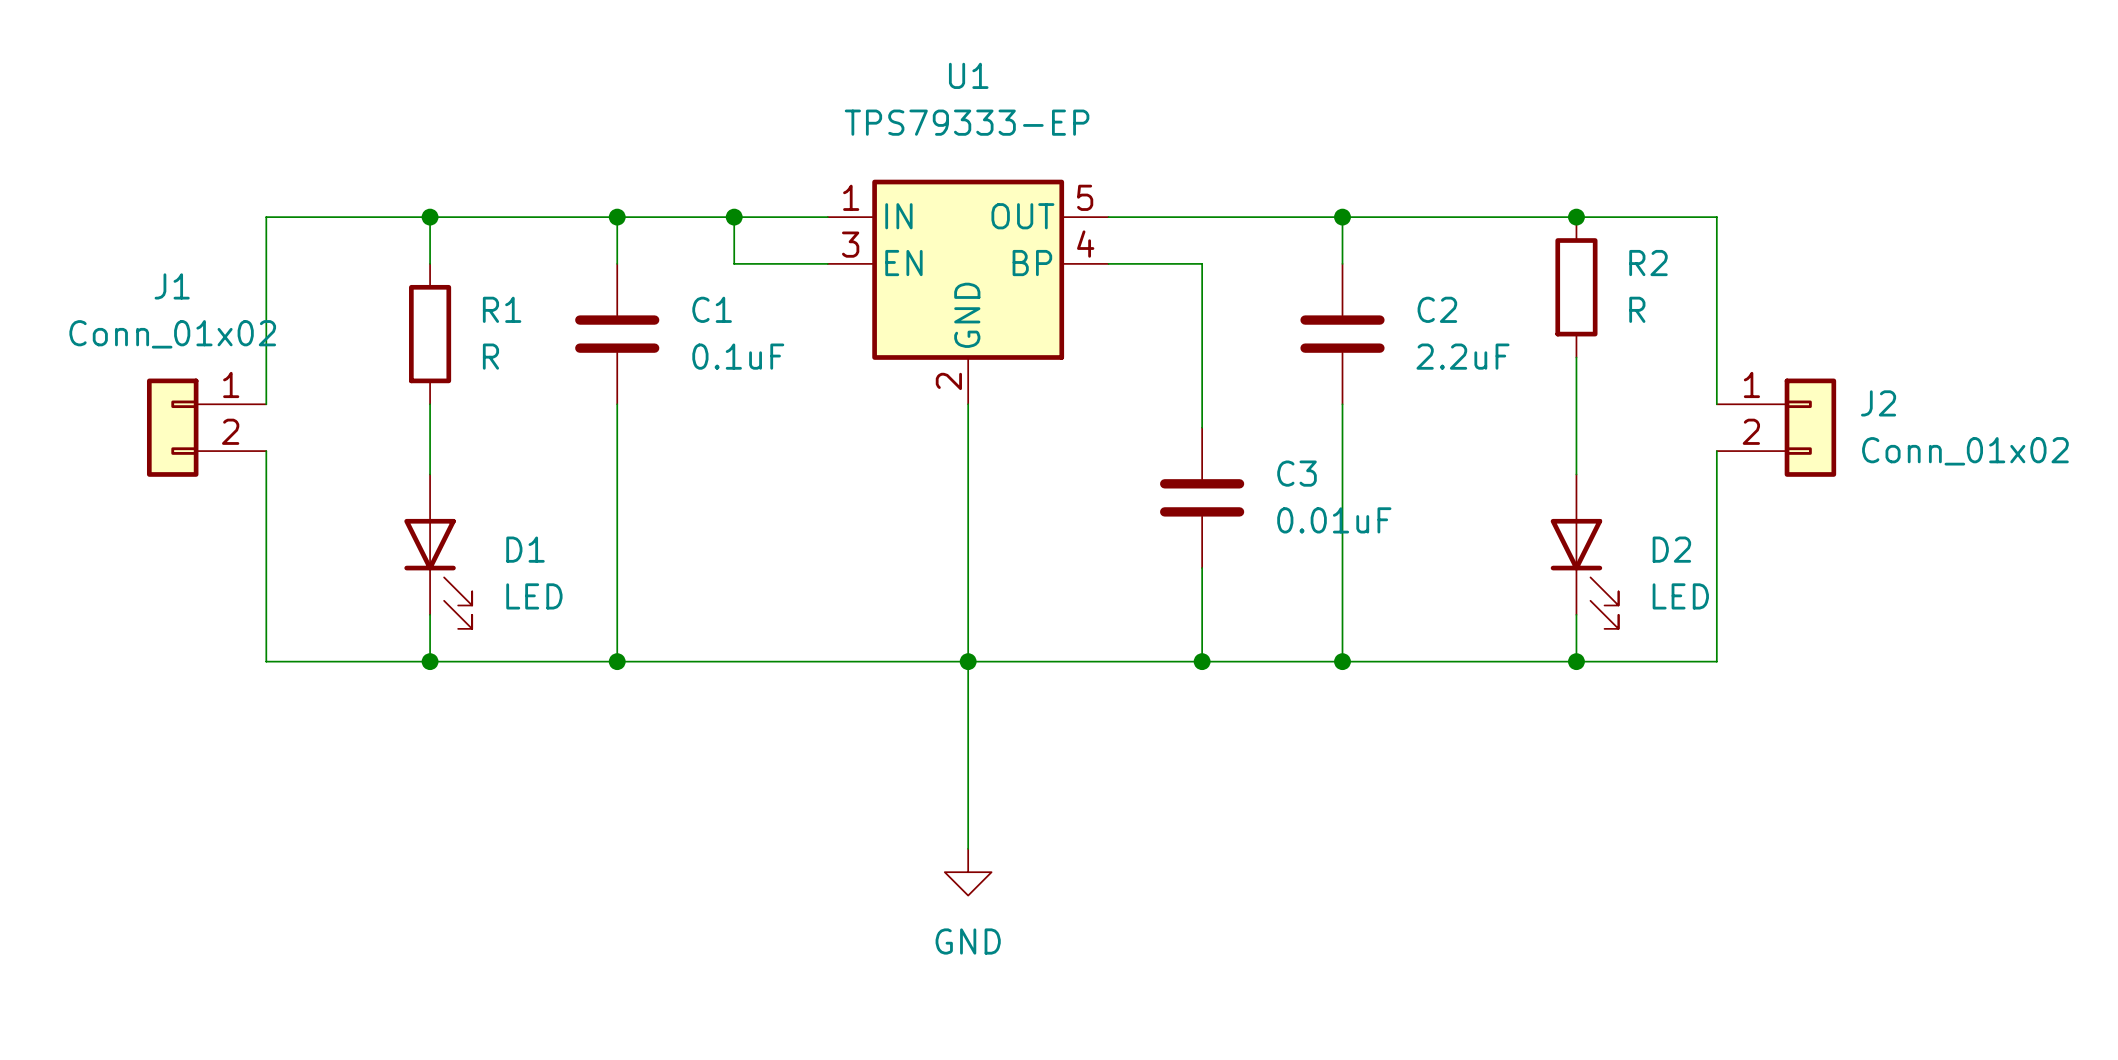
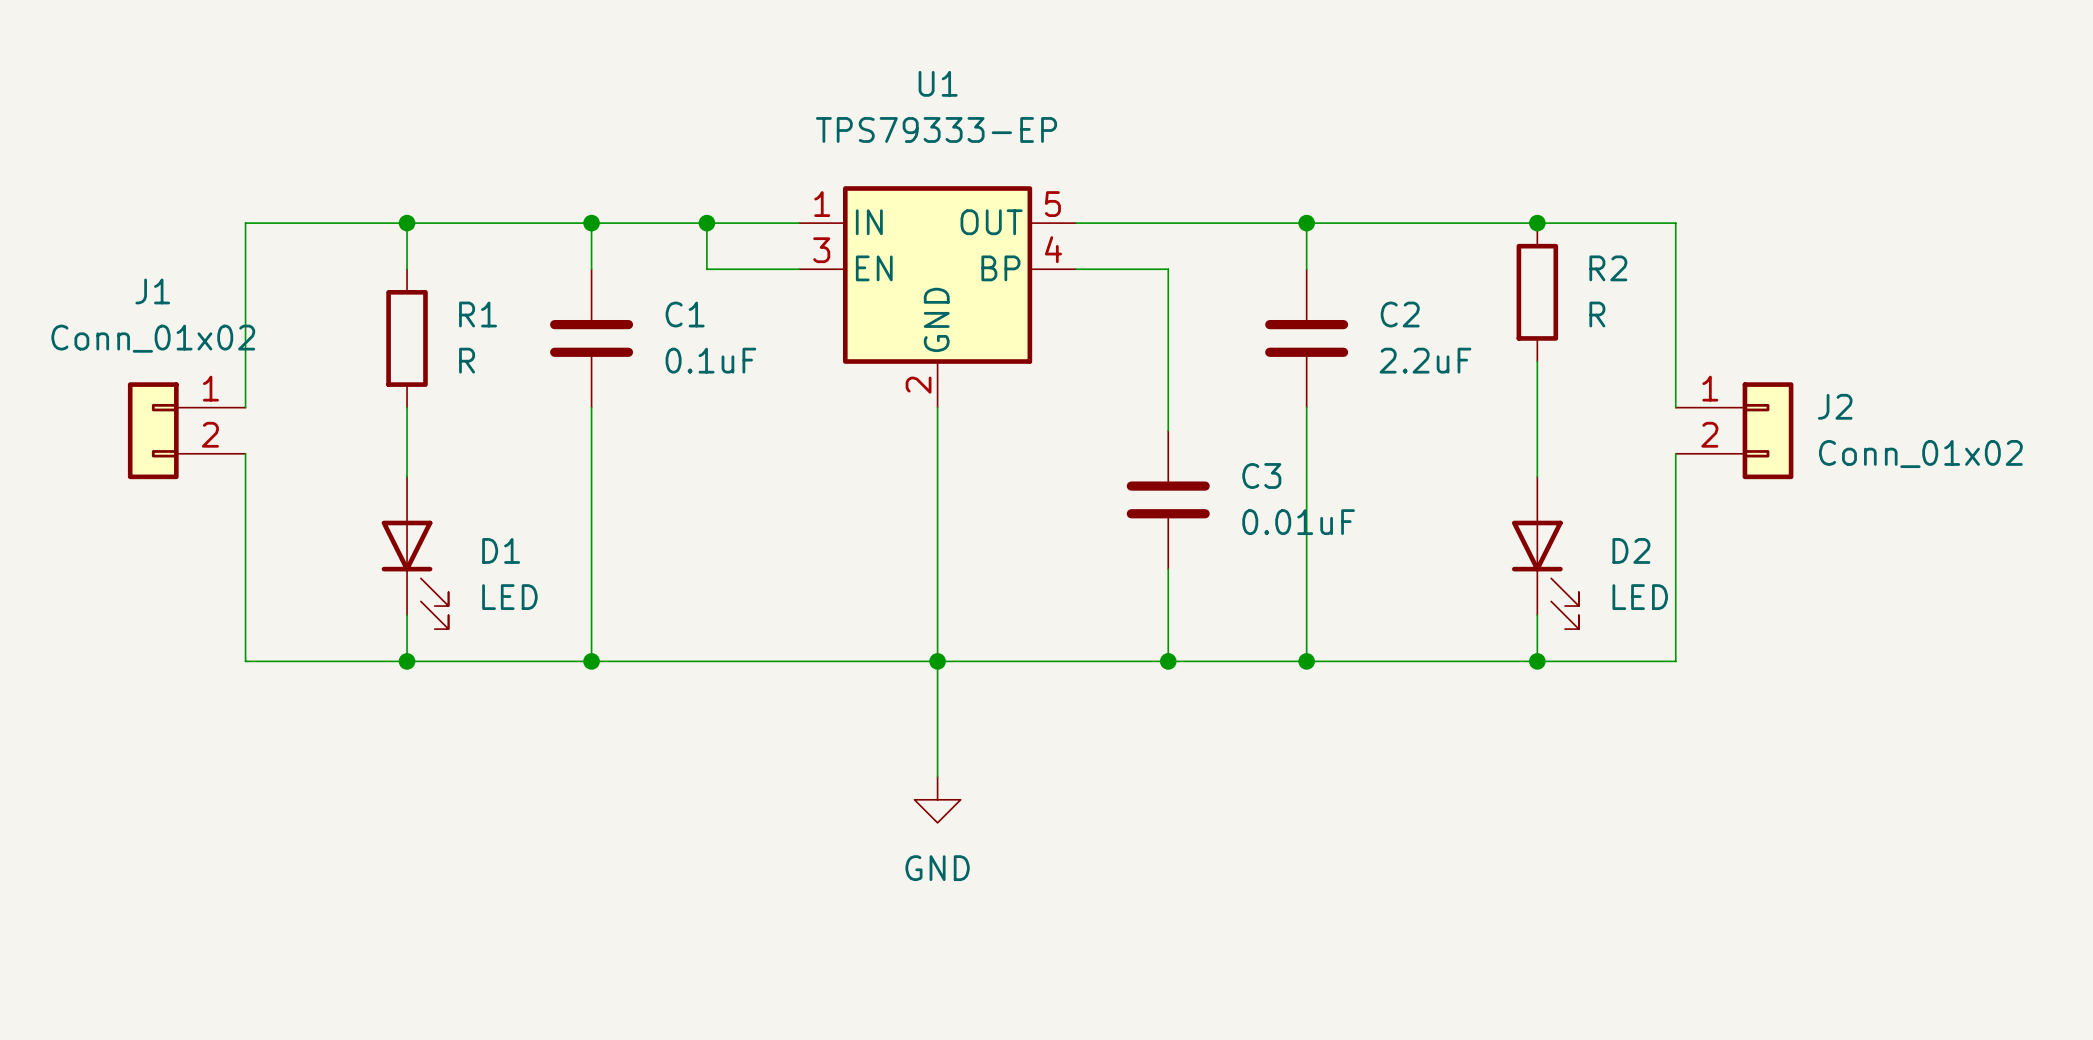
wire: (968, 778) (968, 848) -> none
power symbol position: GND (968, 872) -> GND (937, 799)

